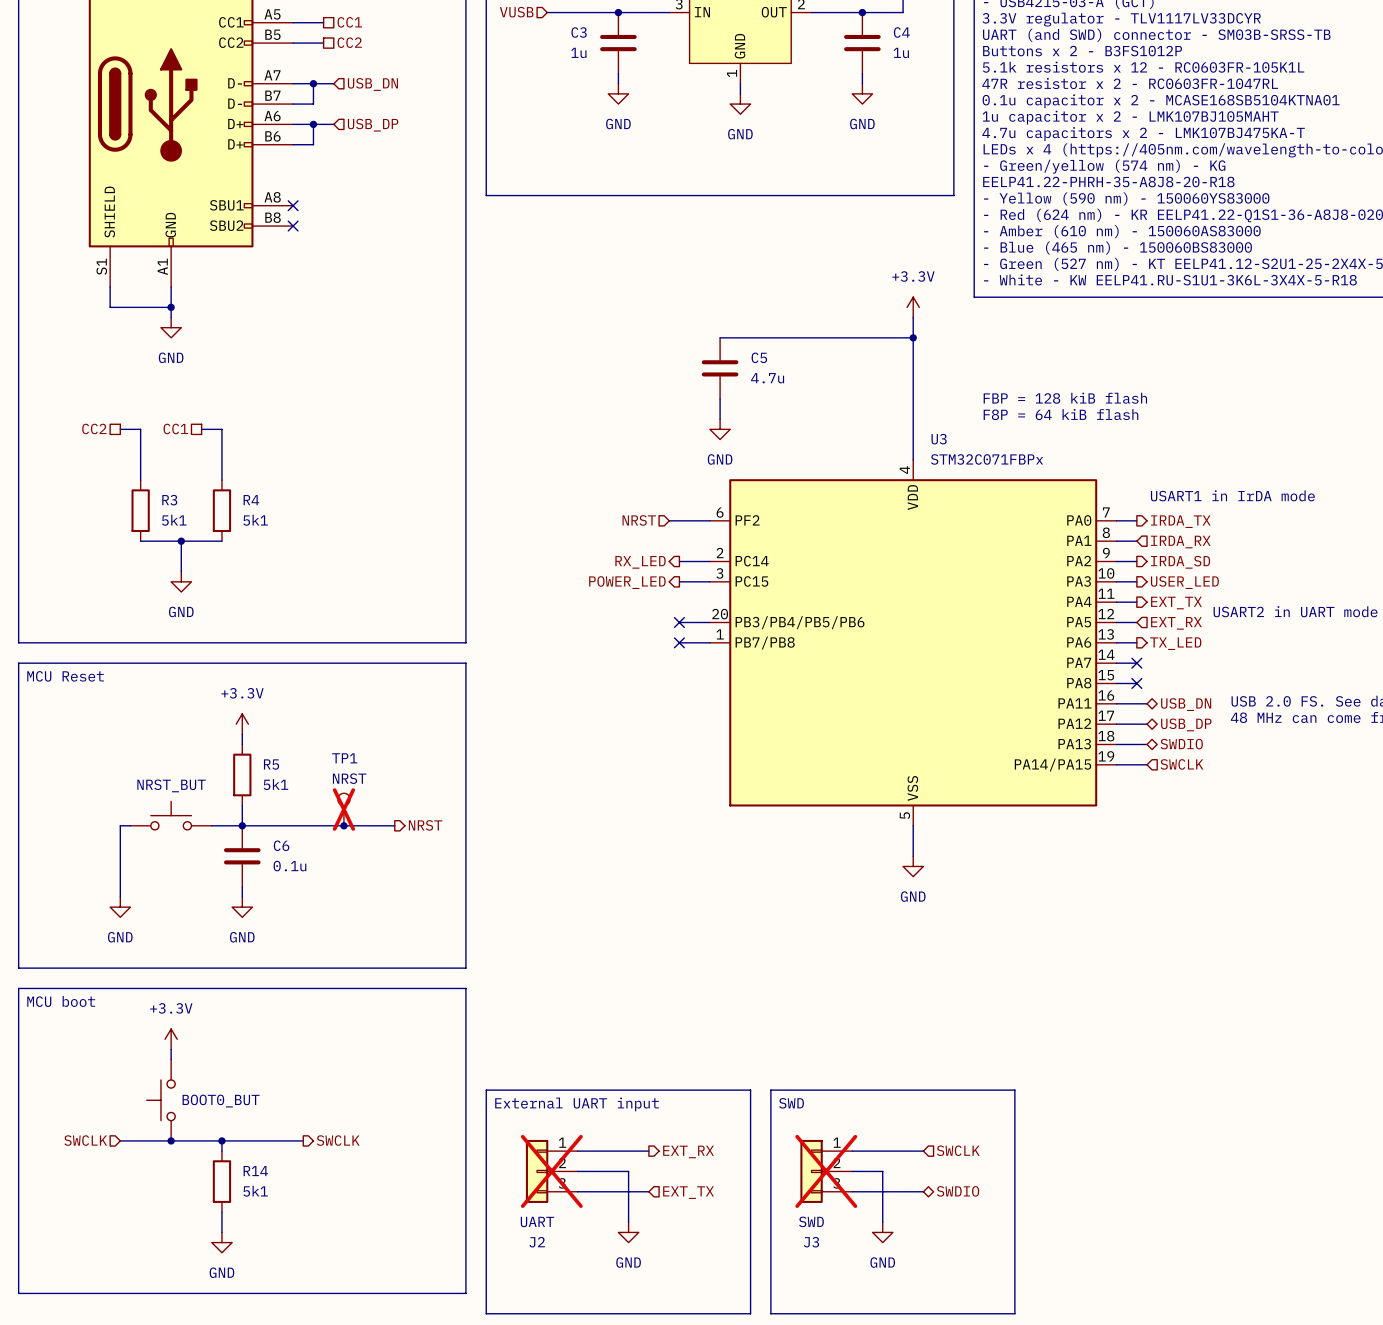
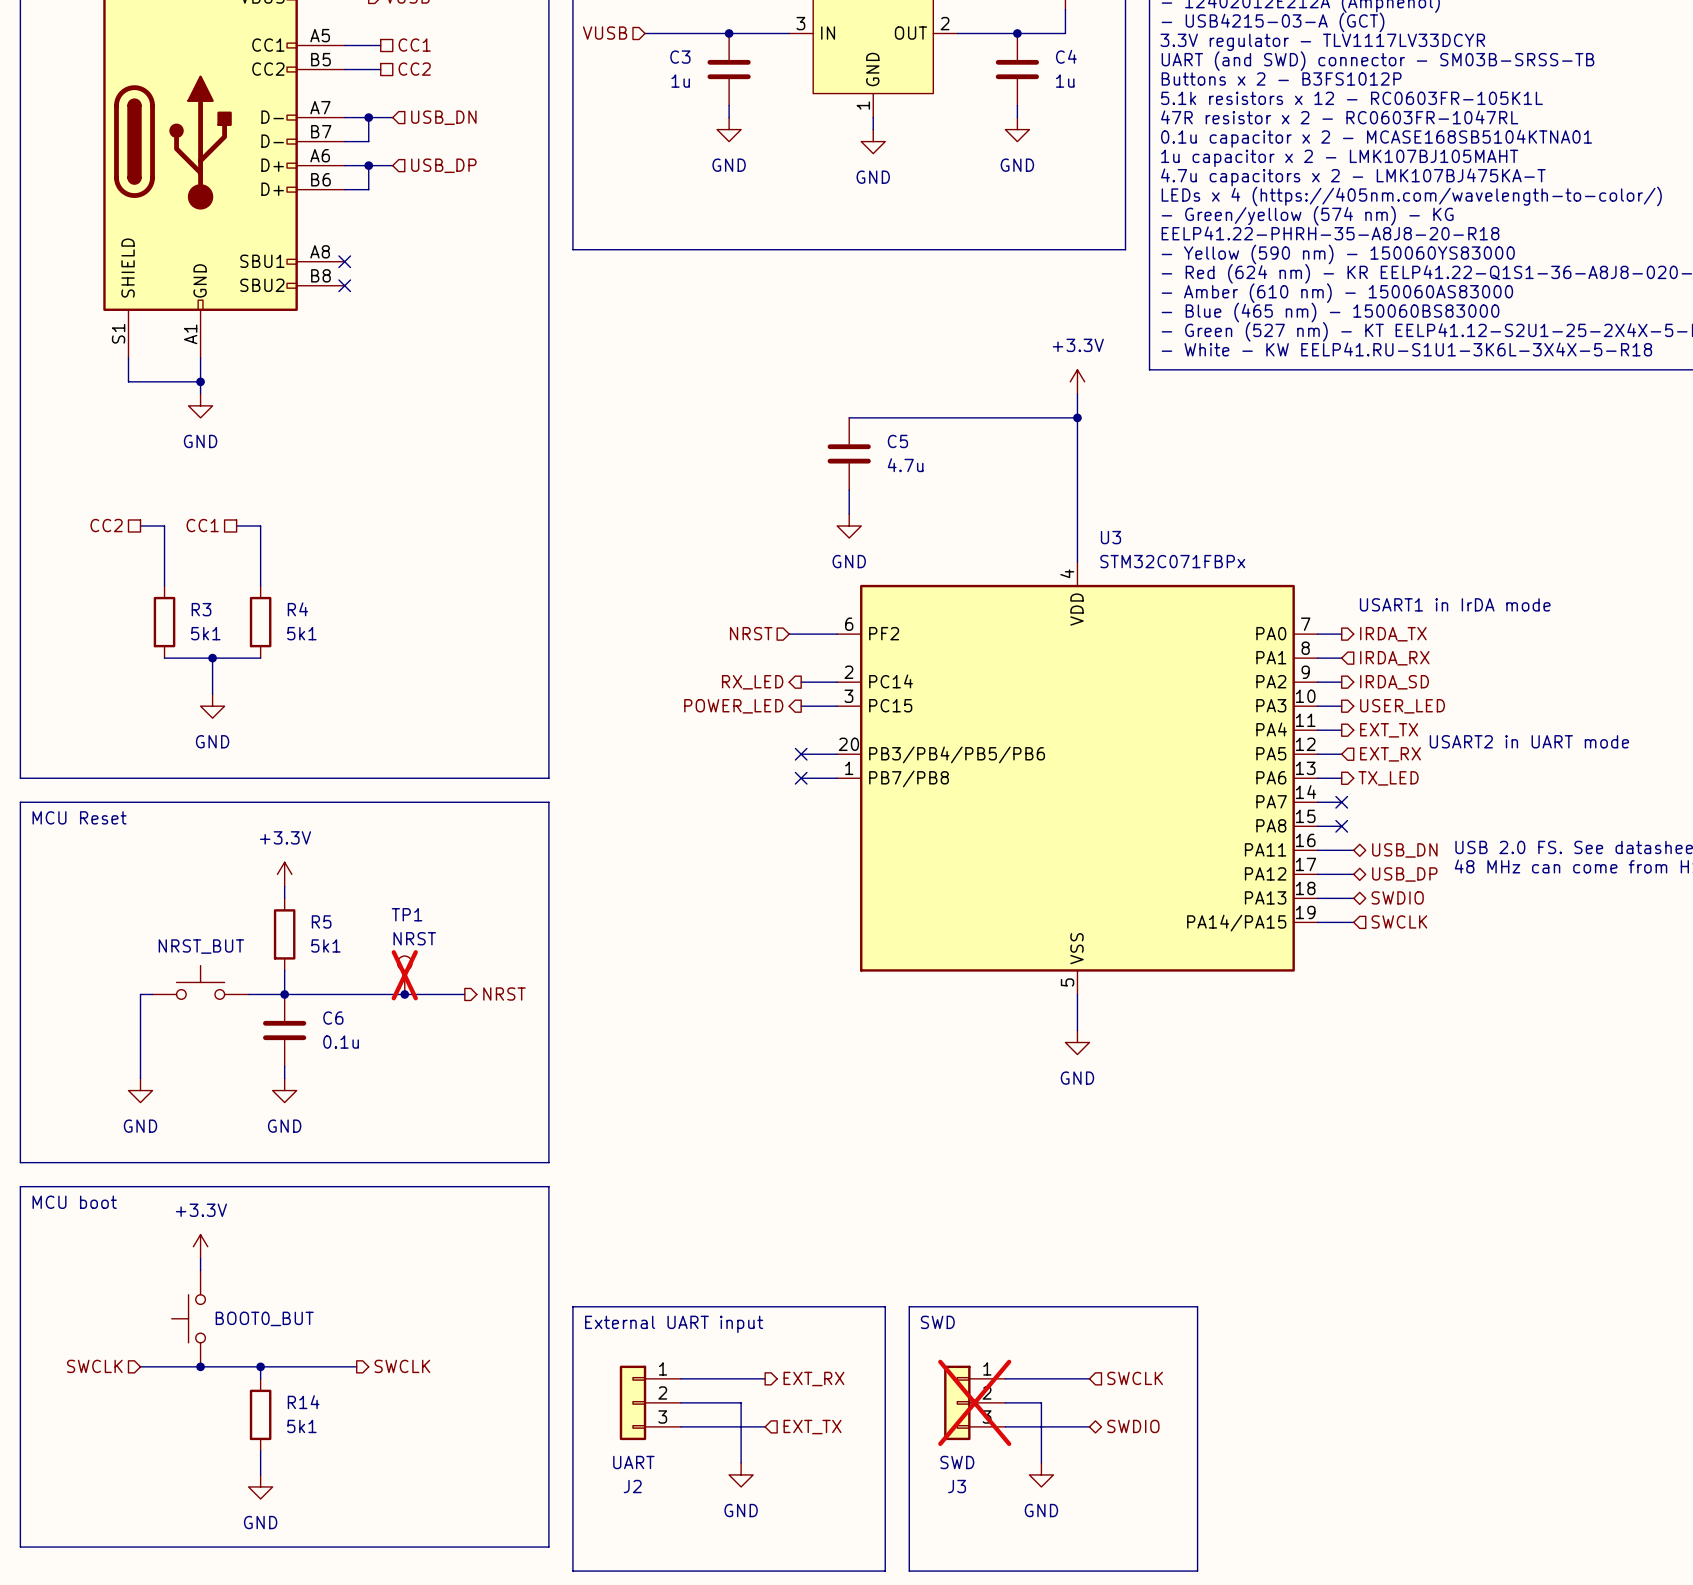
text: FBP = 128 kiB flash (1065, 398) -> none
text: F8P = 64 kiB flash (1060, 414) -> none
J2 do-not-place cross: (551, 1171) -> none

